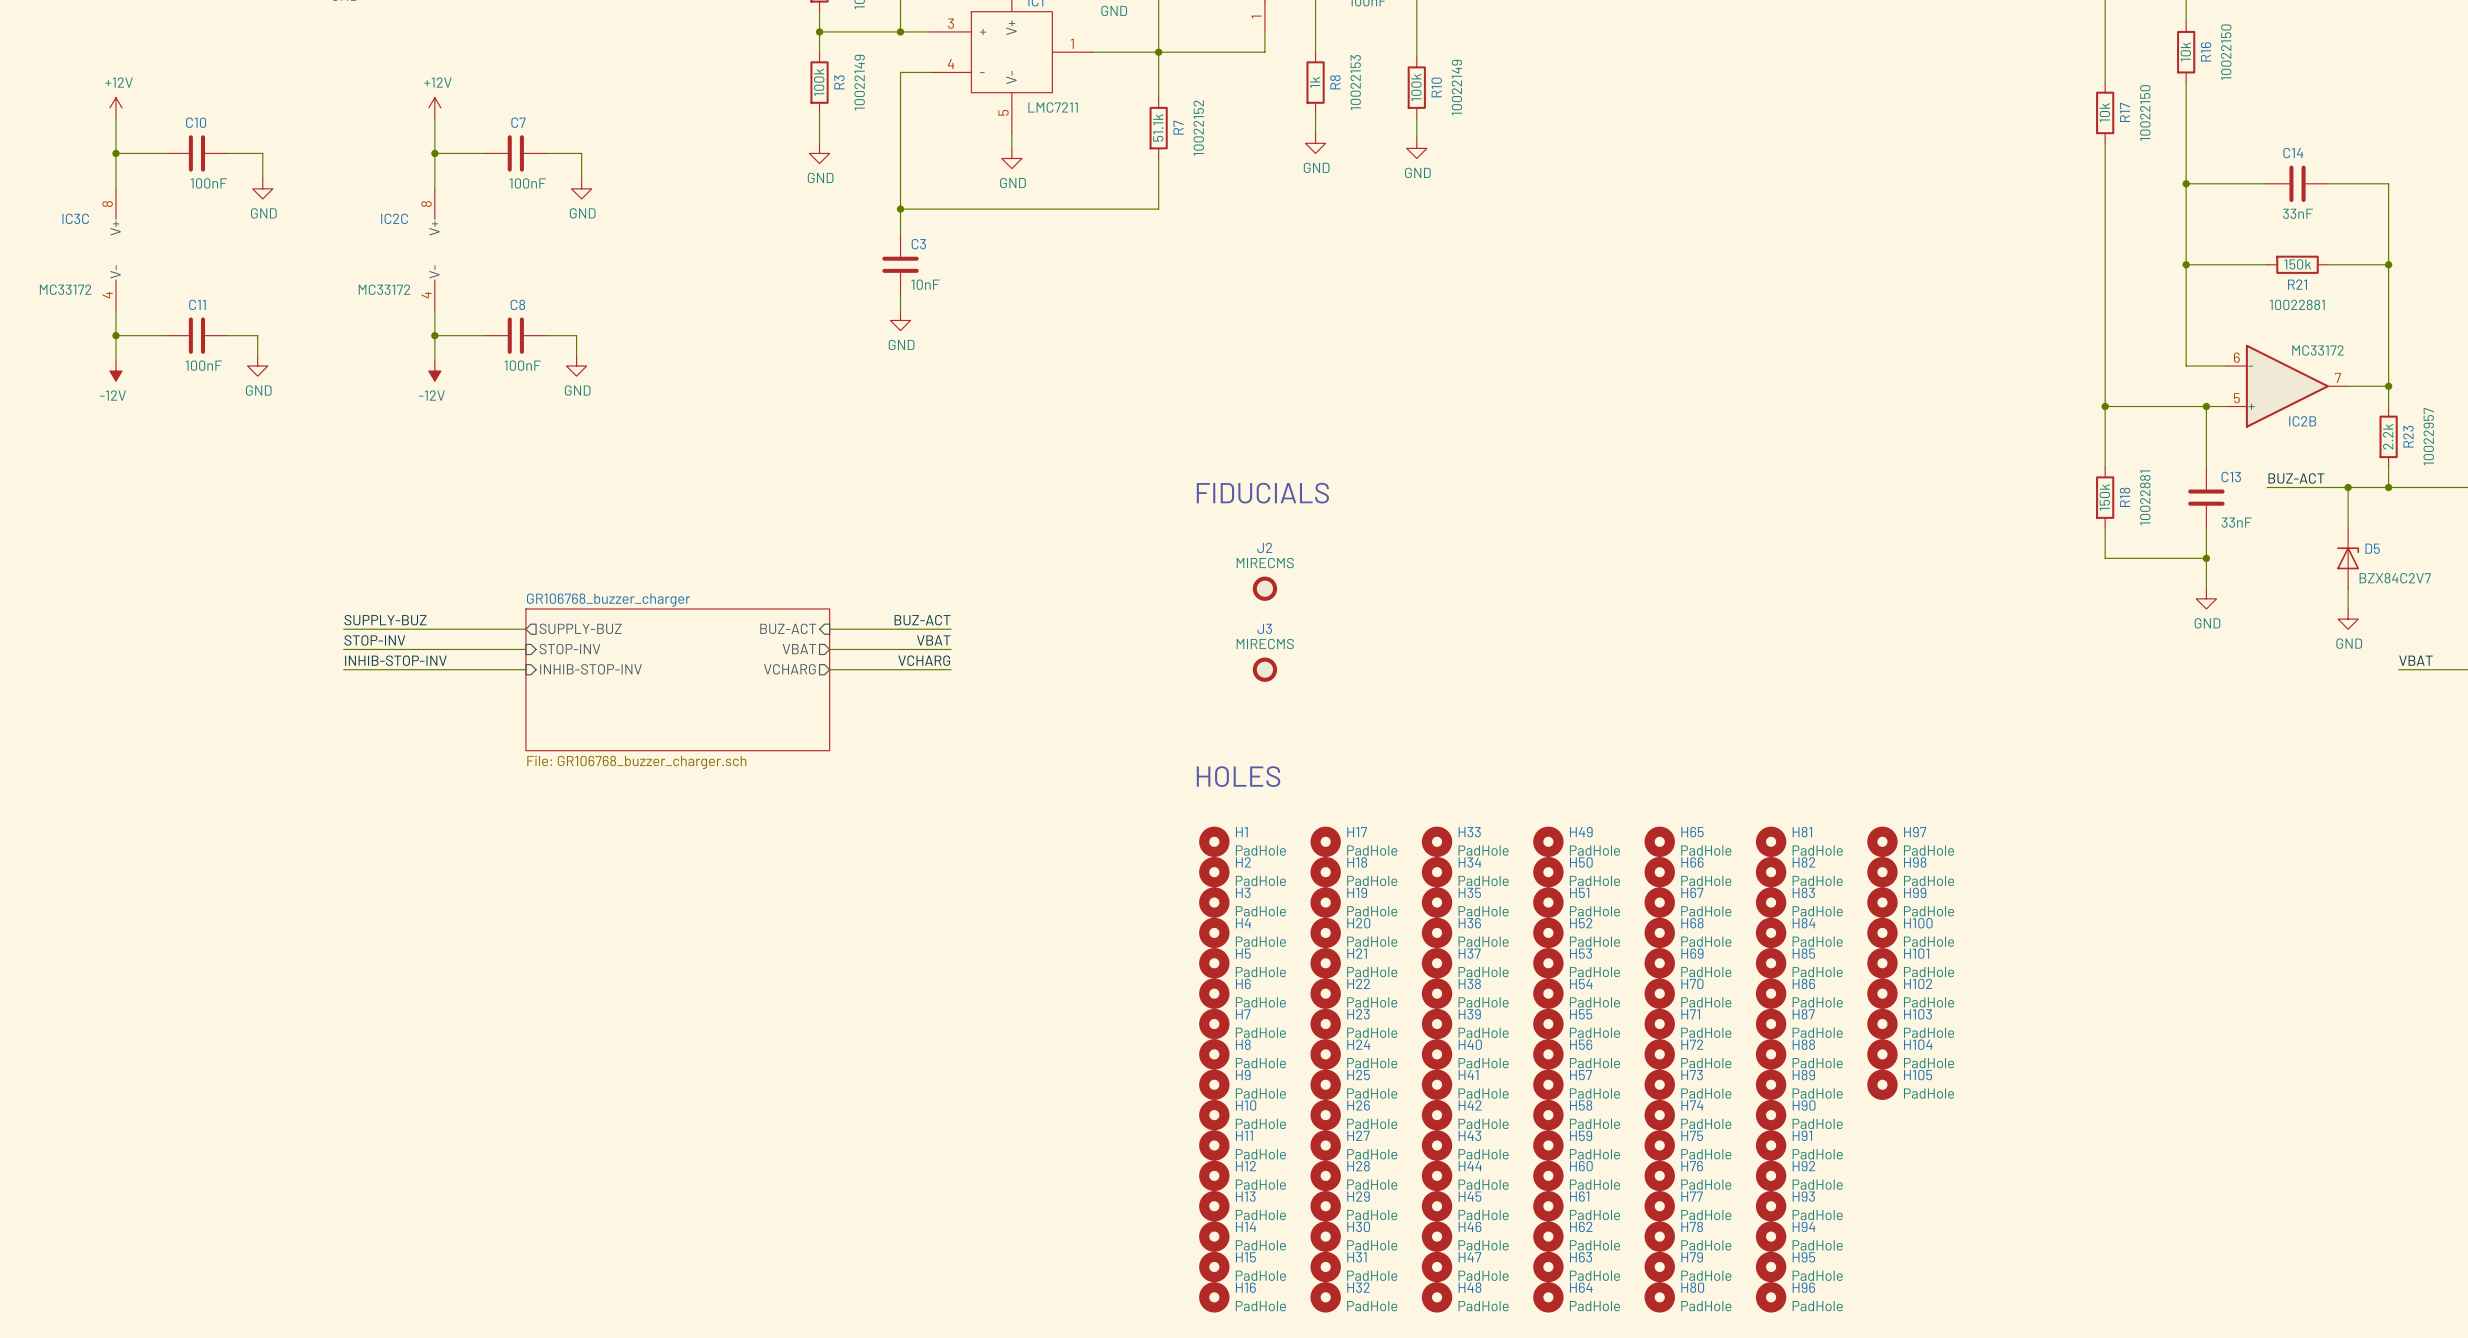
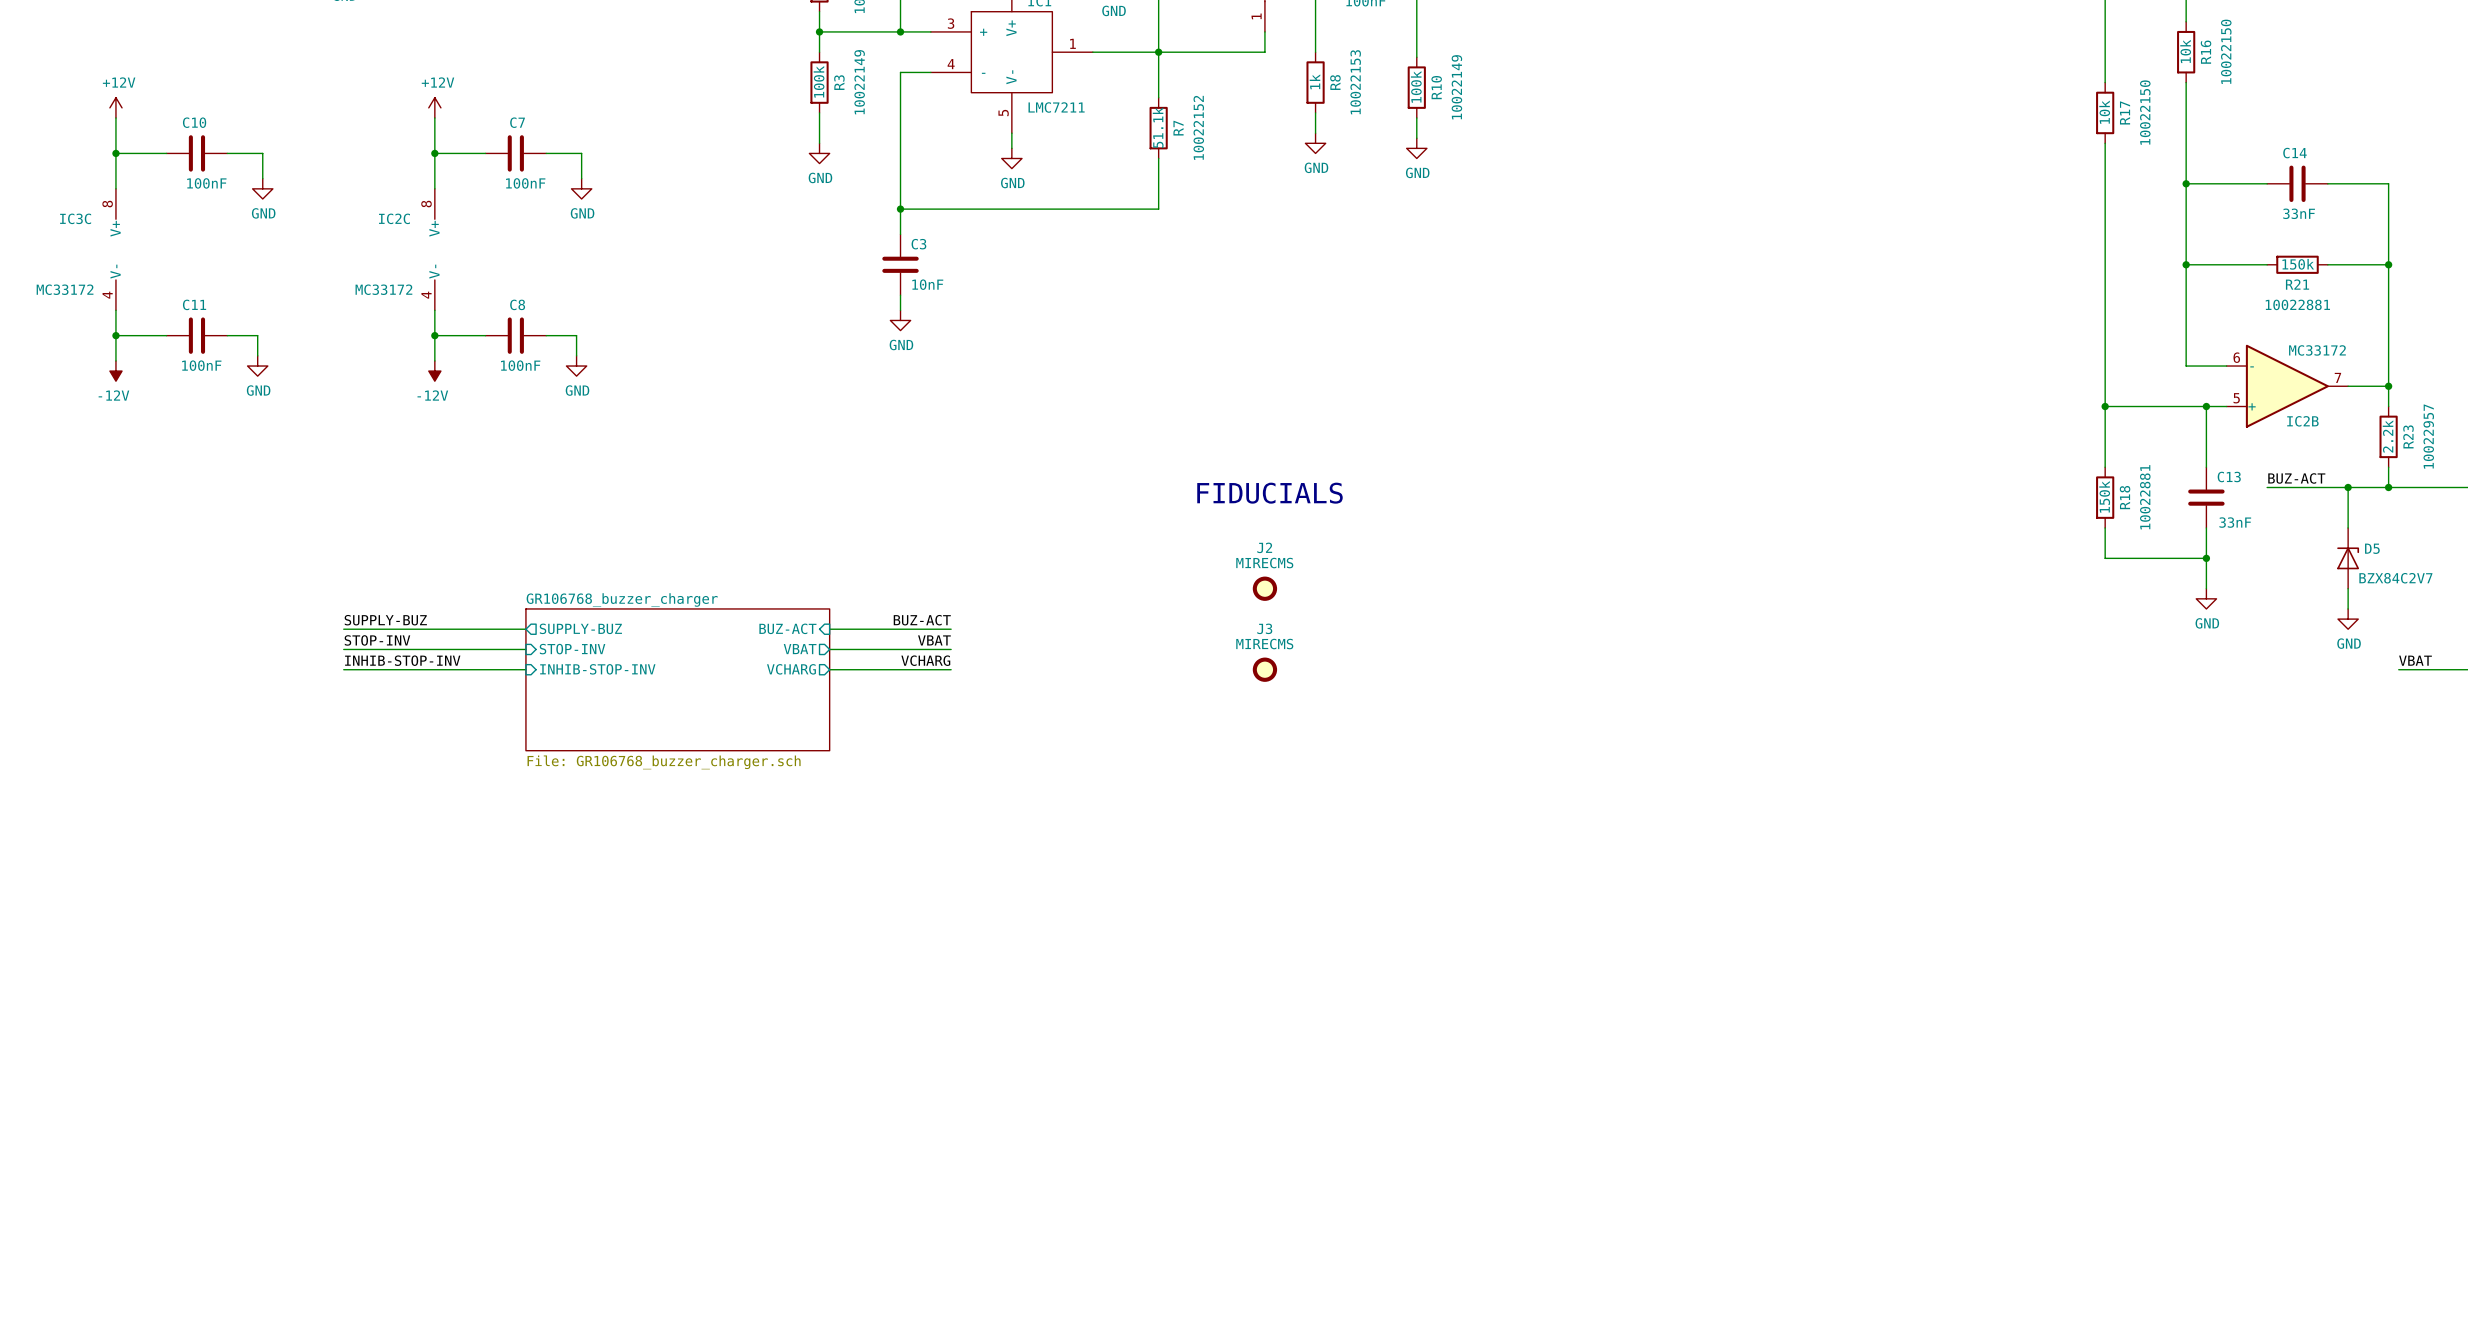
text: HOLES (1238, 776) -> none
H1: PadHole (1214, 841) -> none
H17: PadHole (1325, 841) -> none
H33: PadHole (1437, 841) -> none
H49: PadHole (1548, 841) -> none
H65: PadHole (1659, 841) -> none
H81: PadHole (1771, 841) -> none
H97: PadHole (1882, 841) -> none
H2: PadHole (1214, 872) -> none
H18: PadHole (1325, 872) -> none
H34: PadHole (1437, 872) -> none
H50: PadHole (1548, 872) -> none
H66: PadHole (1659, 872) -> none
H82: PadHole (1771, 872) -> none
H98: PadHole (1882, 872) -> none
H3: PadHole (1214, 902) -> none
H19: PadHole (1325, 902) -> none
H35: PadHole (1437, 902) -> none
H51: PadHole (1548, 902) -> none
H67: PadHole (1659, 902) -> none
H83: PadHole (1771, 902) -> none
H99: PadHole (1882, 902) -> none
H4: PadHole (1214, 932) -> none
H20: PadHole (1325, 932) -> none
H36: PadHole (1437, 932) -> none
H52: PadHole (1548, 932) -> none
H68: PadHole (1659, 932) -> none
H84: PadHole (1771, 932) -> none
H100: PadHole (1882, 932) -> none
H5: PadHole (1214, 963) -> none
H21: PadHole (1325, 963) -> none
H37: PadHole (1437, 963) -> none
H53: PadHole (1548, 963) -> none
H69: PadHole (1659, 963) -> none
H85: PadHole (1771, 963) -> none
H101: PadHole (1882, 963) -> none
H6: PadHole (1214, 993) -> none
H22: PadHole (1325, 993) -> none
H38: PadHole (1437, 993) -> none
H54: PadHole (1548, 993) -> none
H70: PadHole (1659, 993) -> none
H86: PadHole (1771, 993) -> none
H102: PadHole (1882, 993) -> none
H7: PadHole (1214, 1024) -> none
H23: PadHole (1325, 1024) -> none
H39: PadHole (1437, 1024) -> none
H55: PadHole (1548, 1024) -> none
H71: PadHole (1659, 1024) -> none
H87: PadHole (1771, 1024) -> none
H103: PadHole (1882, 1024) -> none
H8: PadHole (1214, 1054) -> none
H24: PadHole (1325, 1054) -> none
H40: PadHole (1437, 1054) -> none
H56: PadHole (1548, 1054) -> none
H72: PadHole (1659, 1054) -> none
H88: PadHole (1771, 1054) -> none
H104: PadHole (1882, 1054) -> none
H9: PadHole (1214, 1084) -> none
H25: PadHole (1325, 1084) -> none
H41: PadHole (1437, 1084) -> none
H57: PadHole (1548, 1084) -> none
H73: PadHole (1659, 1084) -> none
H89: PadHole (1771, 1084) -> none
H105: PadHole (1882, 1084) -> none
H10: PadHole (1214, 1115) -> none
H26: PadHole (1325, 1115) -> none
H42: PadHole (1437, 1115) -> none
H58: PadHole (1548, 1115) -> none
H74: PadHole (1659, 1115) -> none
H90: PadHole (1771, 1115) -> none
H11: PadHole (1214, 1145) -> none
H27: PadHole (1325, 1145) -> none
H43: PadHole (1437, 1145) -> none
H59: PadHole (1548, 1145) -> none
H75: PadHole (1659, 1145) -> none
H91: PadHole (1771, 1145) -> none
H12: PadHole (1214, 1175) -> none
H28: PadHole (1325, 1175) -> none
H44: PadHole (1437, 1175) -> none
H60: PadHole (1548, 1175) -> none
H76: PadHole (1659, 1175) -> none
H92: PadHole (1771, 1175) -> none
H13: PadHole (1214, 1206) -> none
H29: PadHole (1325, 1206) -> none
H45: PadHole (1437, 1206) -> none
H61: PadHole (1548, 1206) -> none
H77: PadHole (1659, 1206) -> none
H93: PadHole (1771, 1206) -> none
H14: PadHole (1214, 1236) -> none
H30: PadHole (1325, 1236) -> none
H46: PadHole (1437, 1236) -> none
H62: PadHole (1548, 1236) -> none
H78: PadHole (1659, 1236) -> none
H94: PadHole (1771, 1236) -> none
H15: PadHole (1214, 1266) -> none
H31: PadHole (1325, 1266) -> none
H47: PadHole (1437, 1266) -> none
H63: PadHole (1548, 1266) -> none
H79: PadHole (1659, 1266) -> none
H95: PadHole (1771, 1266) -> none
H16: PadHole (1214, 1297) -> none
H32: PadHole (1325, 1297) -> none
H48: PadHole (1437, 1297) -> none
H64: PadHole (1548, 1297) -> none
H80: PadHole (1659, 1297) -> none
H96: PadHole (1771, 1297) -> none

